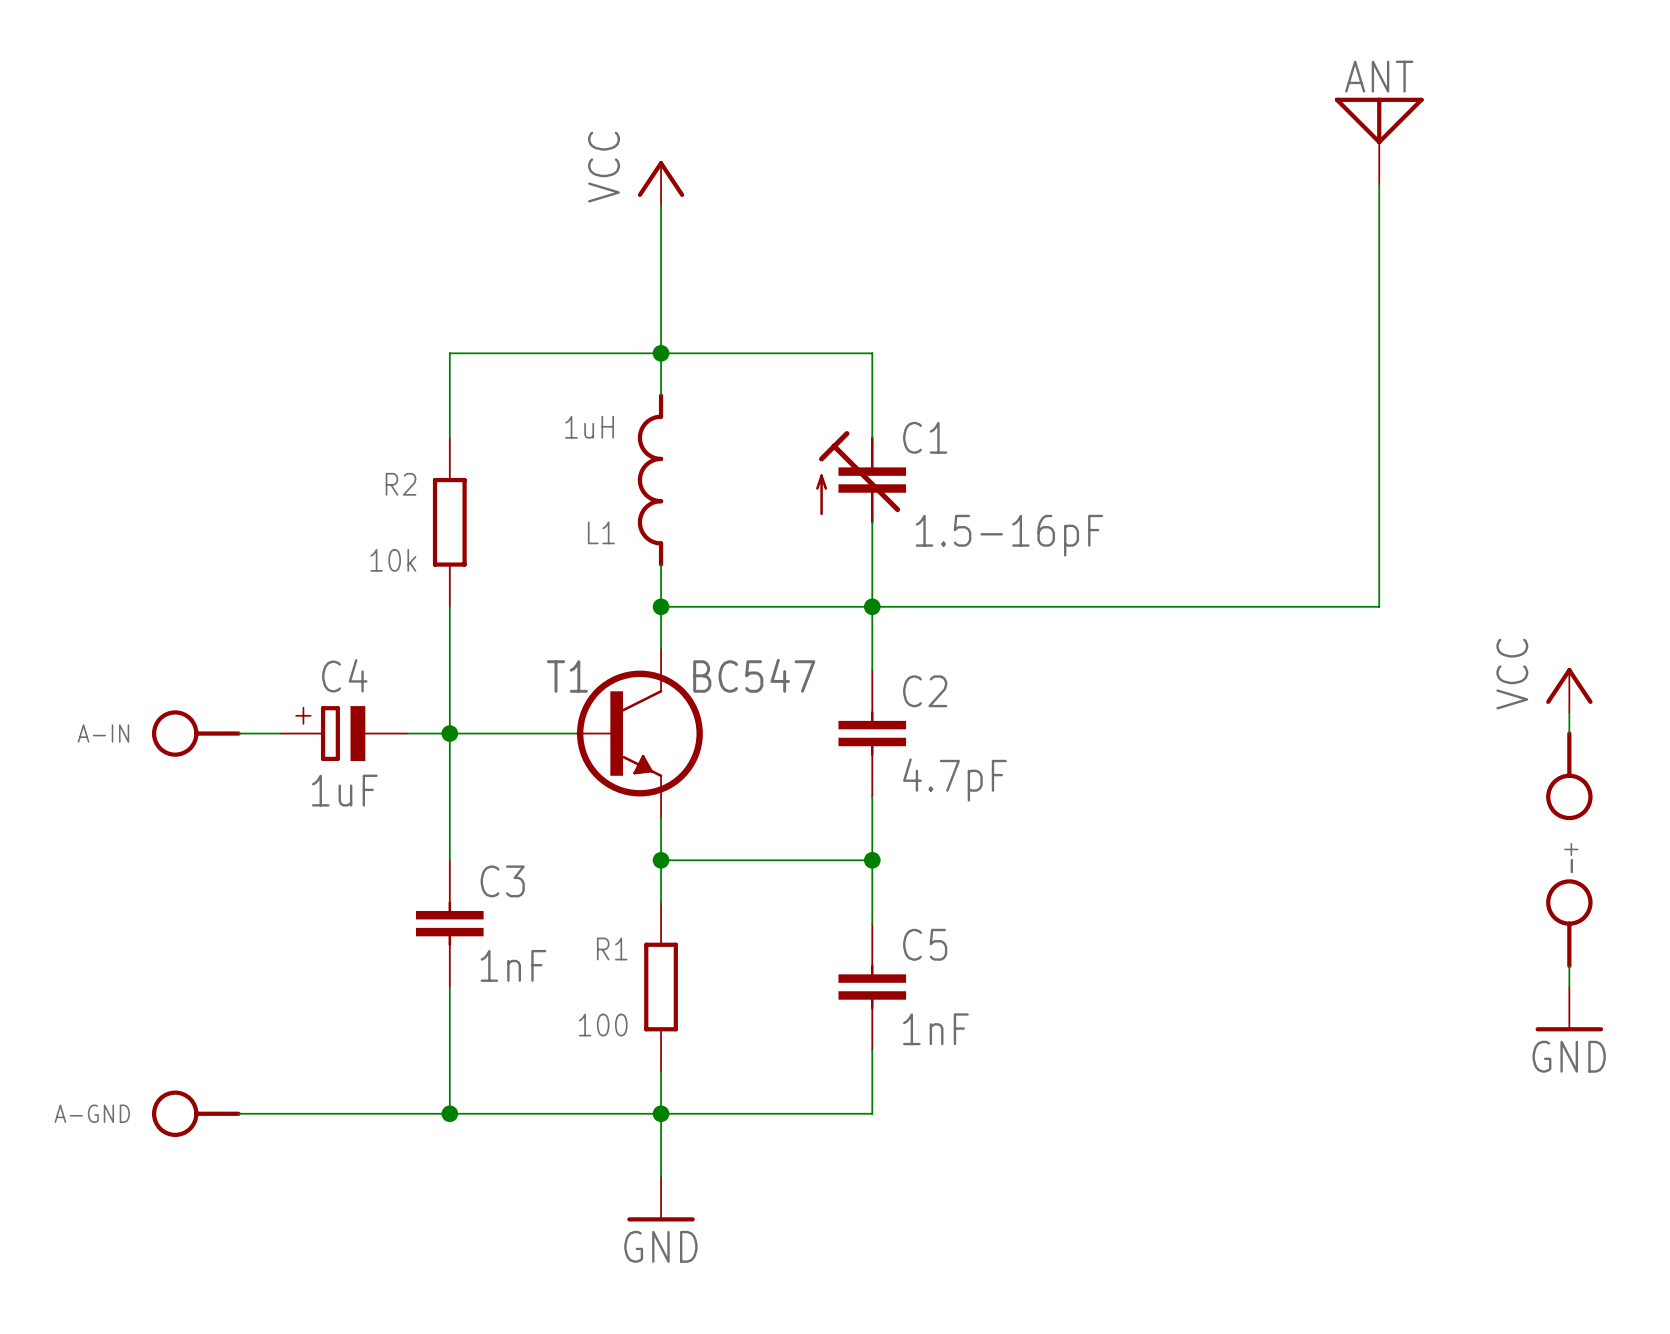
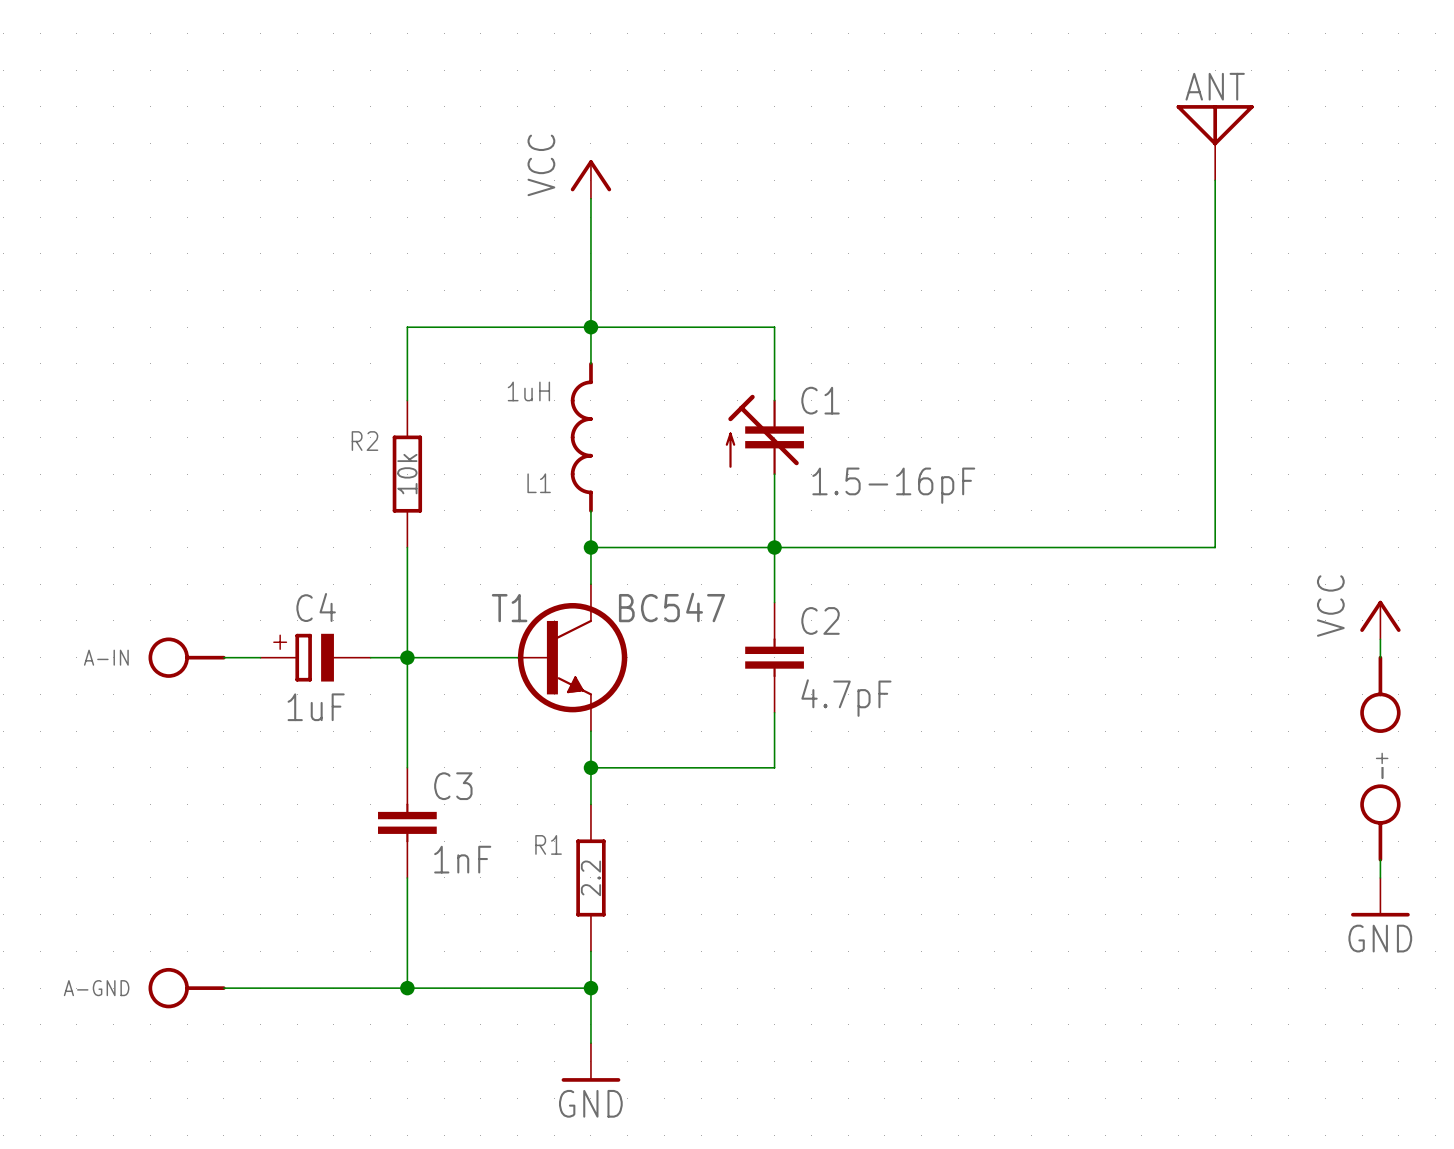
R2 value rotation: 0° (393, 560) -> 90° counterclockwise (407, 474)
R2 value position: 10k (393, 560) -> 10k (407, 474)
wire: (872, 860) (872, 923) -> none
junction: (872, 860) -> none
C5: 1nF (872, 987) -> none
R1 value: 100 (603, 1025) -> 2.2 (590, 878)
wire: (872, 1050) (872, 1113) (661, 1113) -> none

